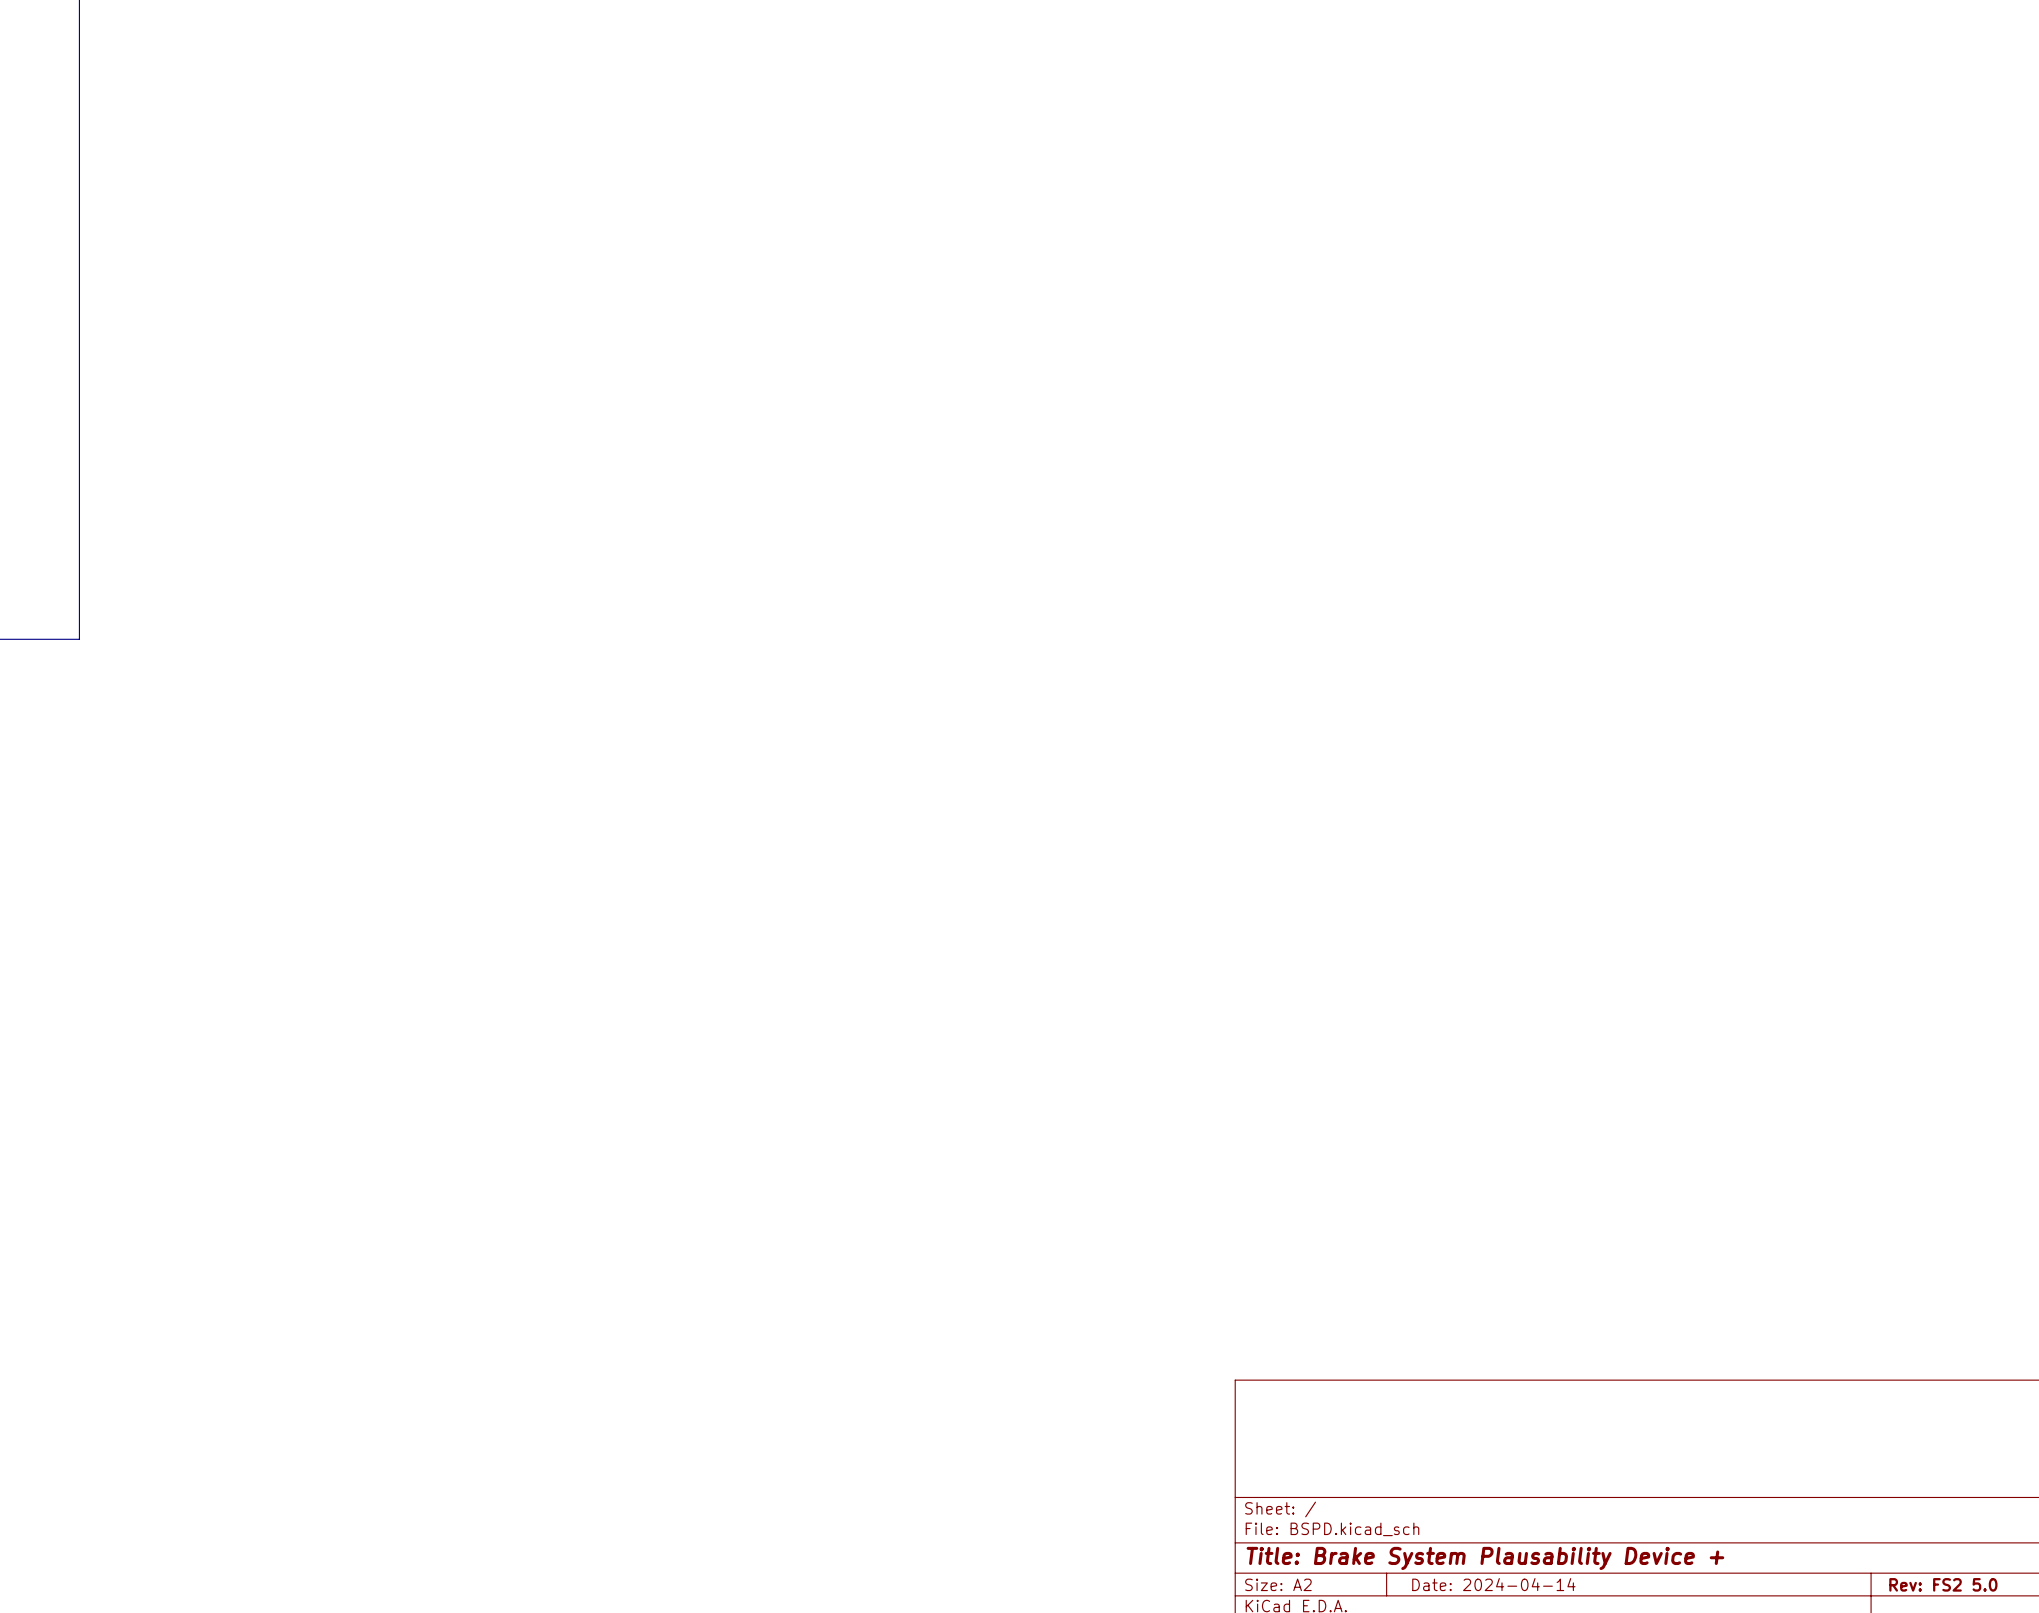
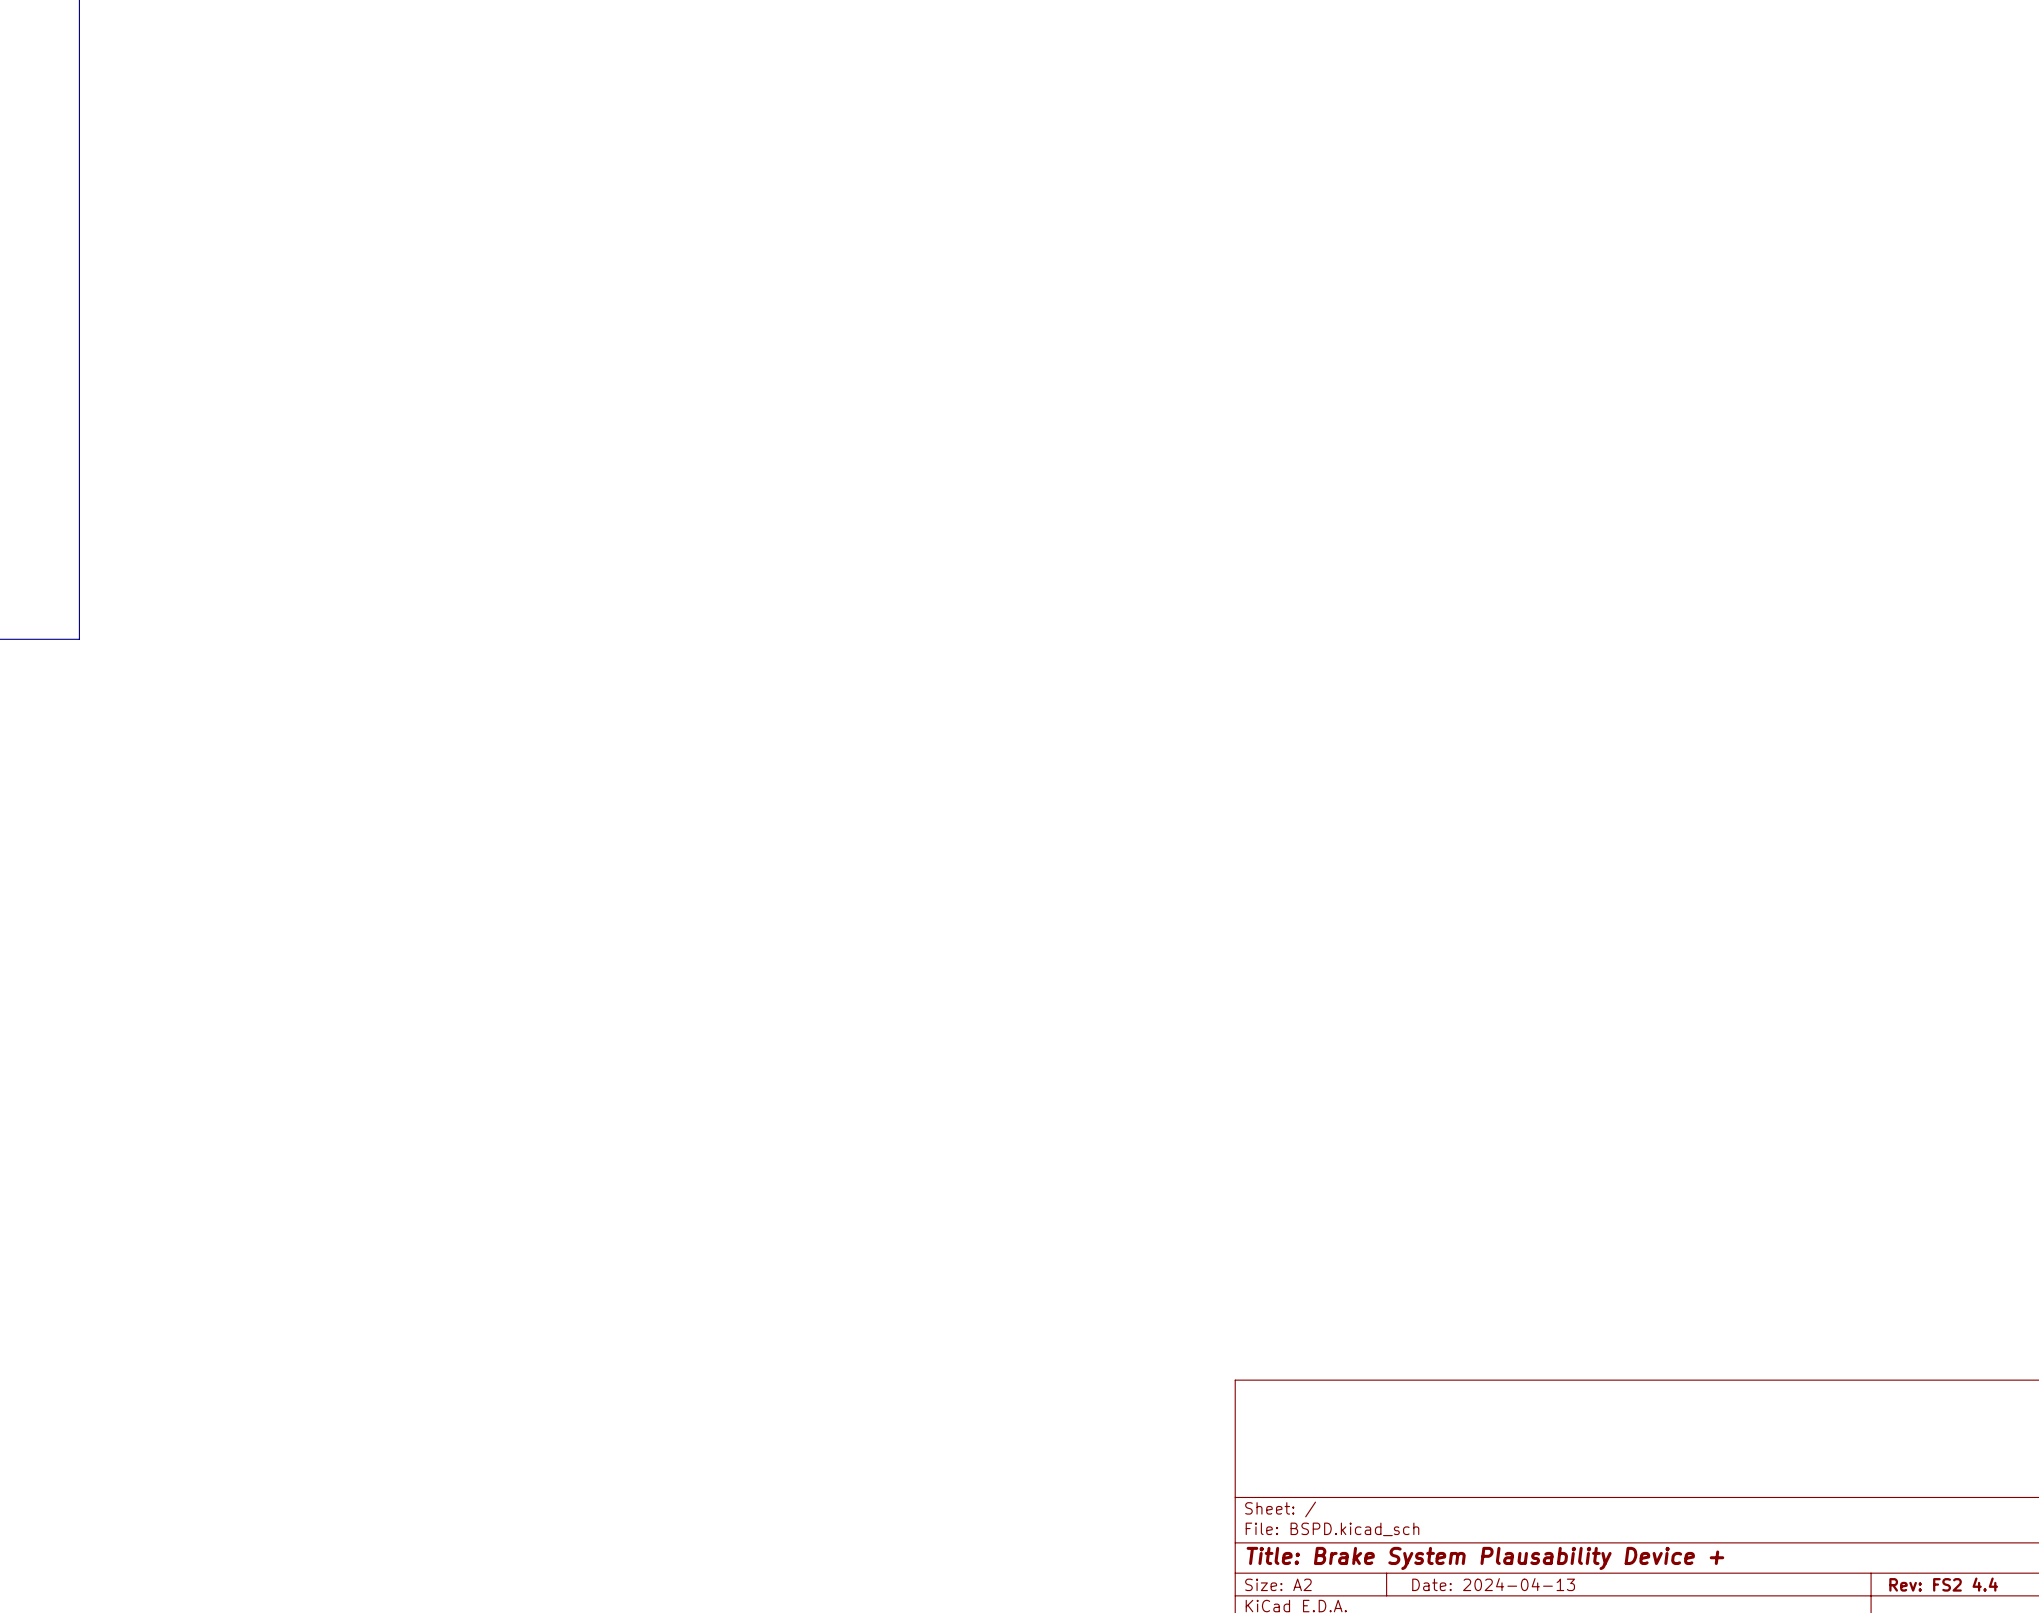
title block: Date: 2024-04-14 (1493, 1584) -> Date: 2024-04-13 (1493, 1584)
title block: Rev: FS2 5.0 (1943, 1584) -> Rev: FS2 4.4 (1943, 1584)

